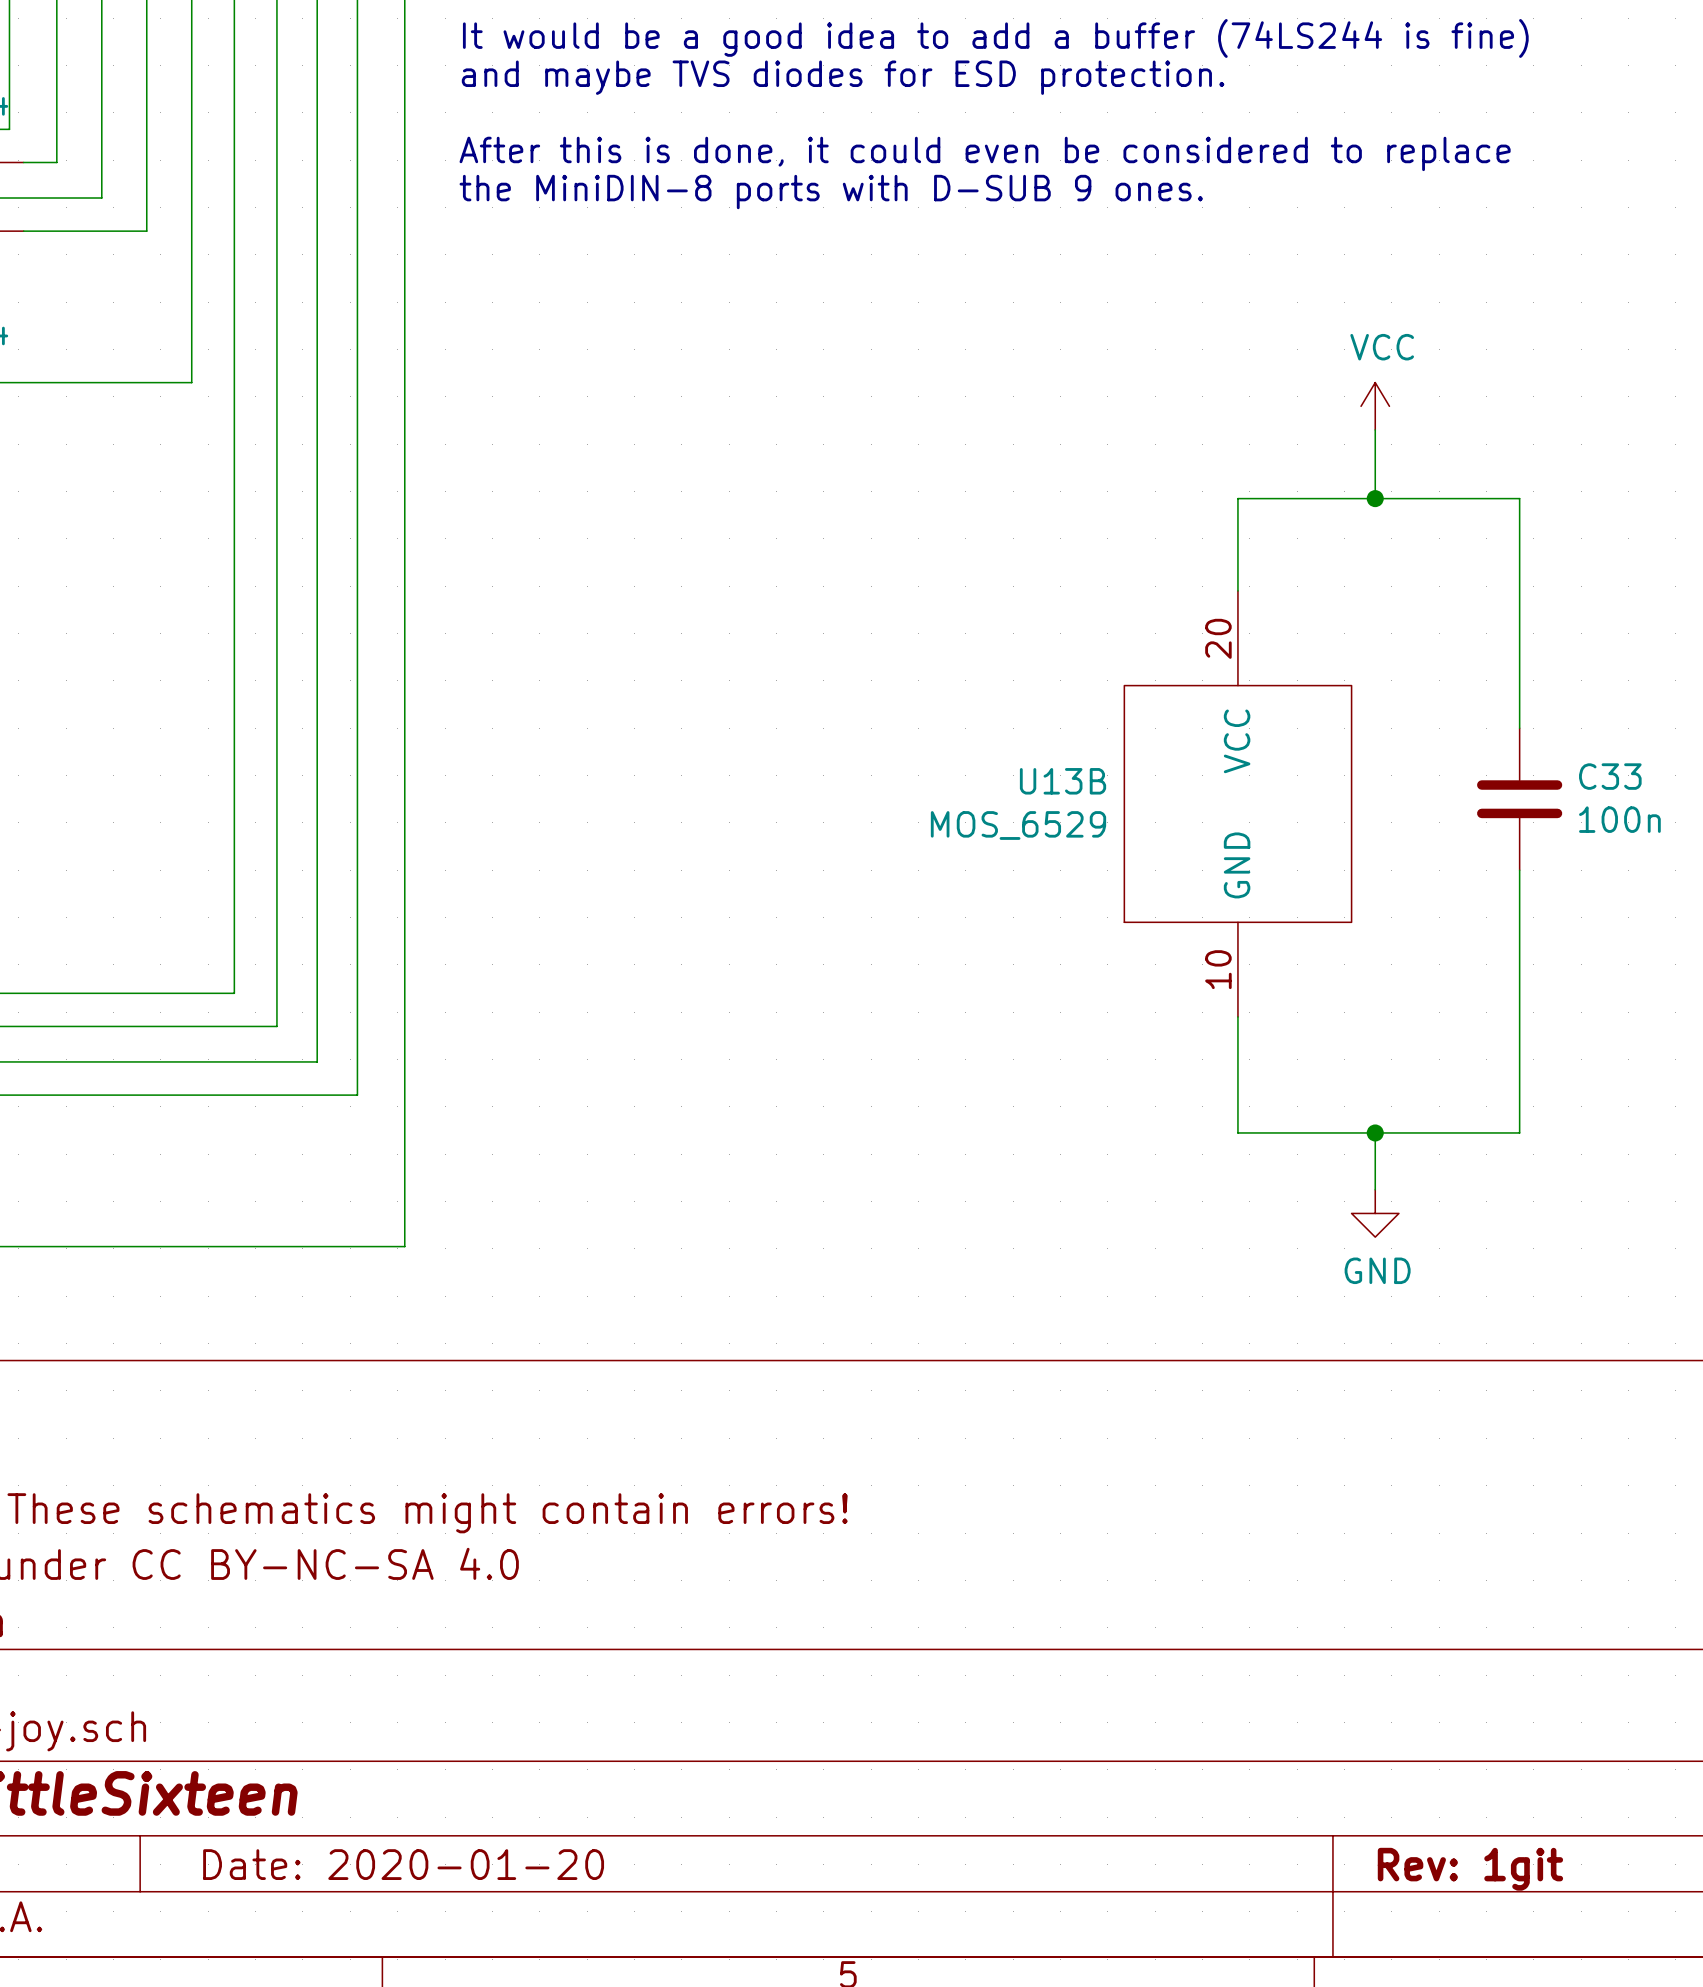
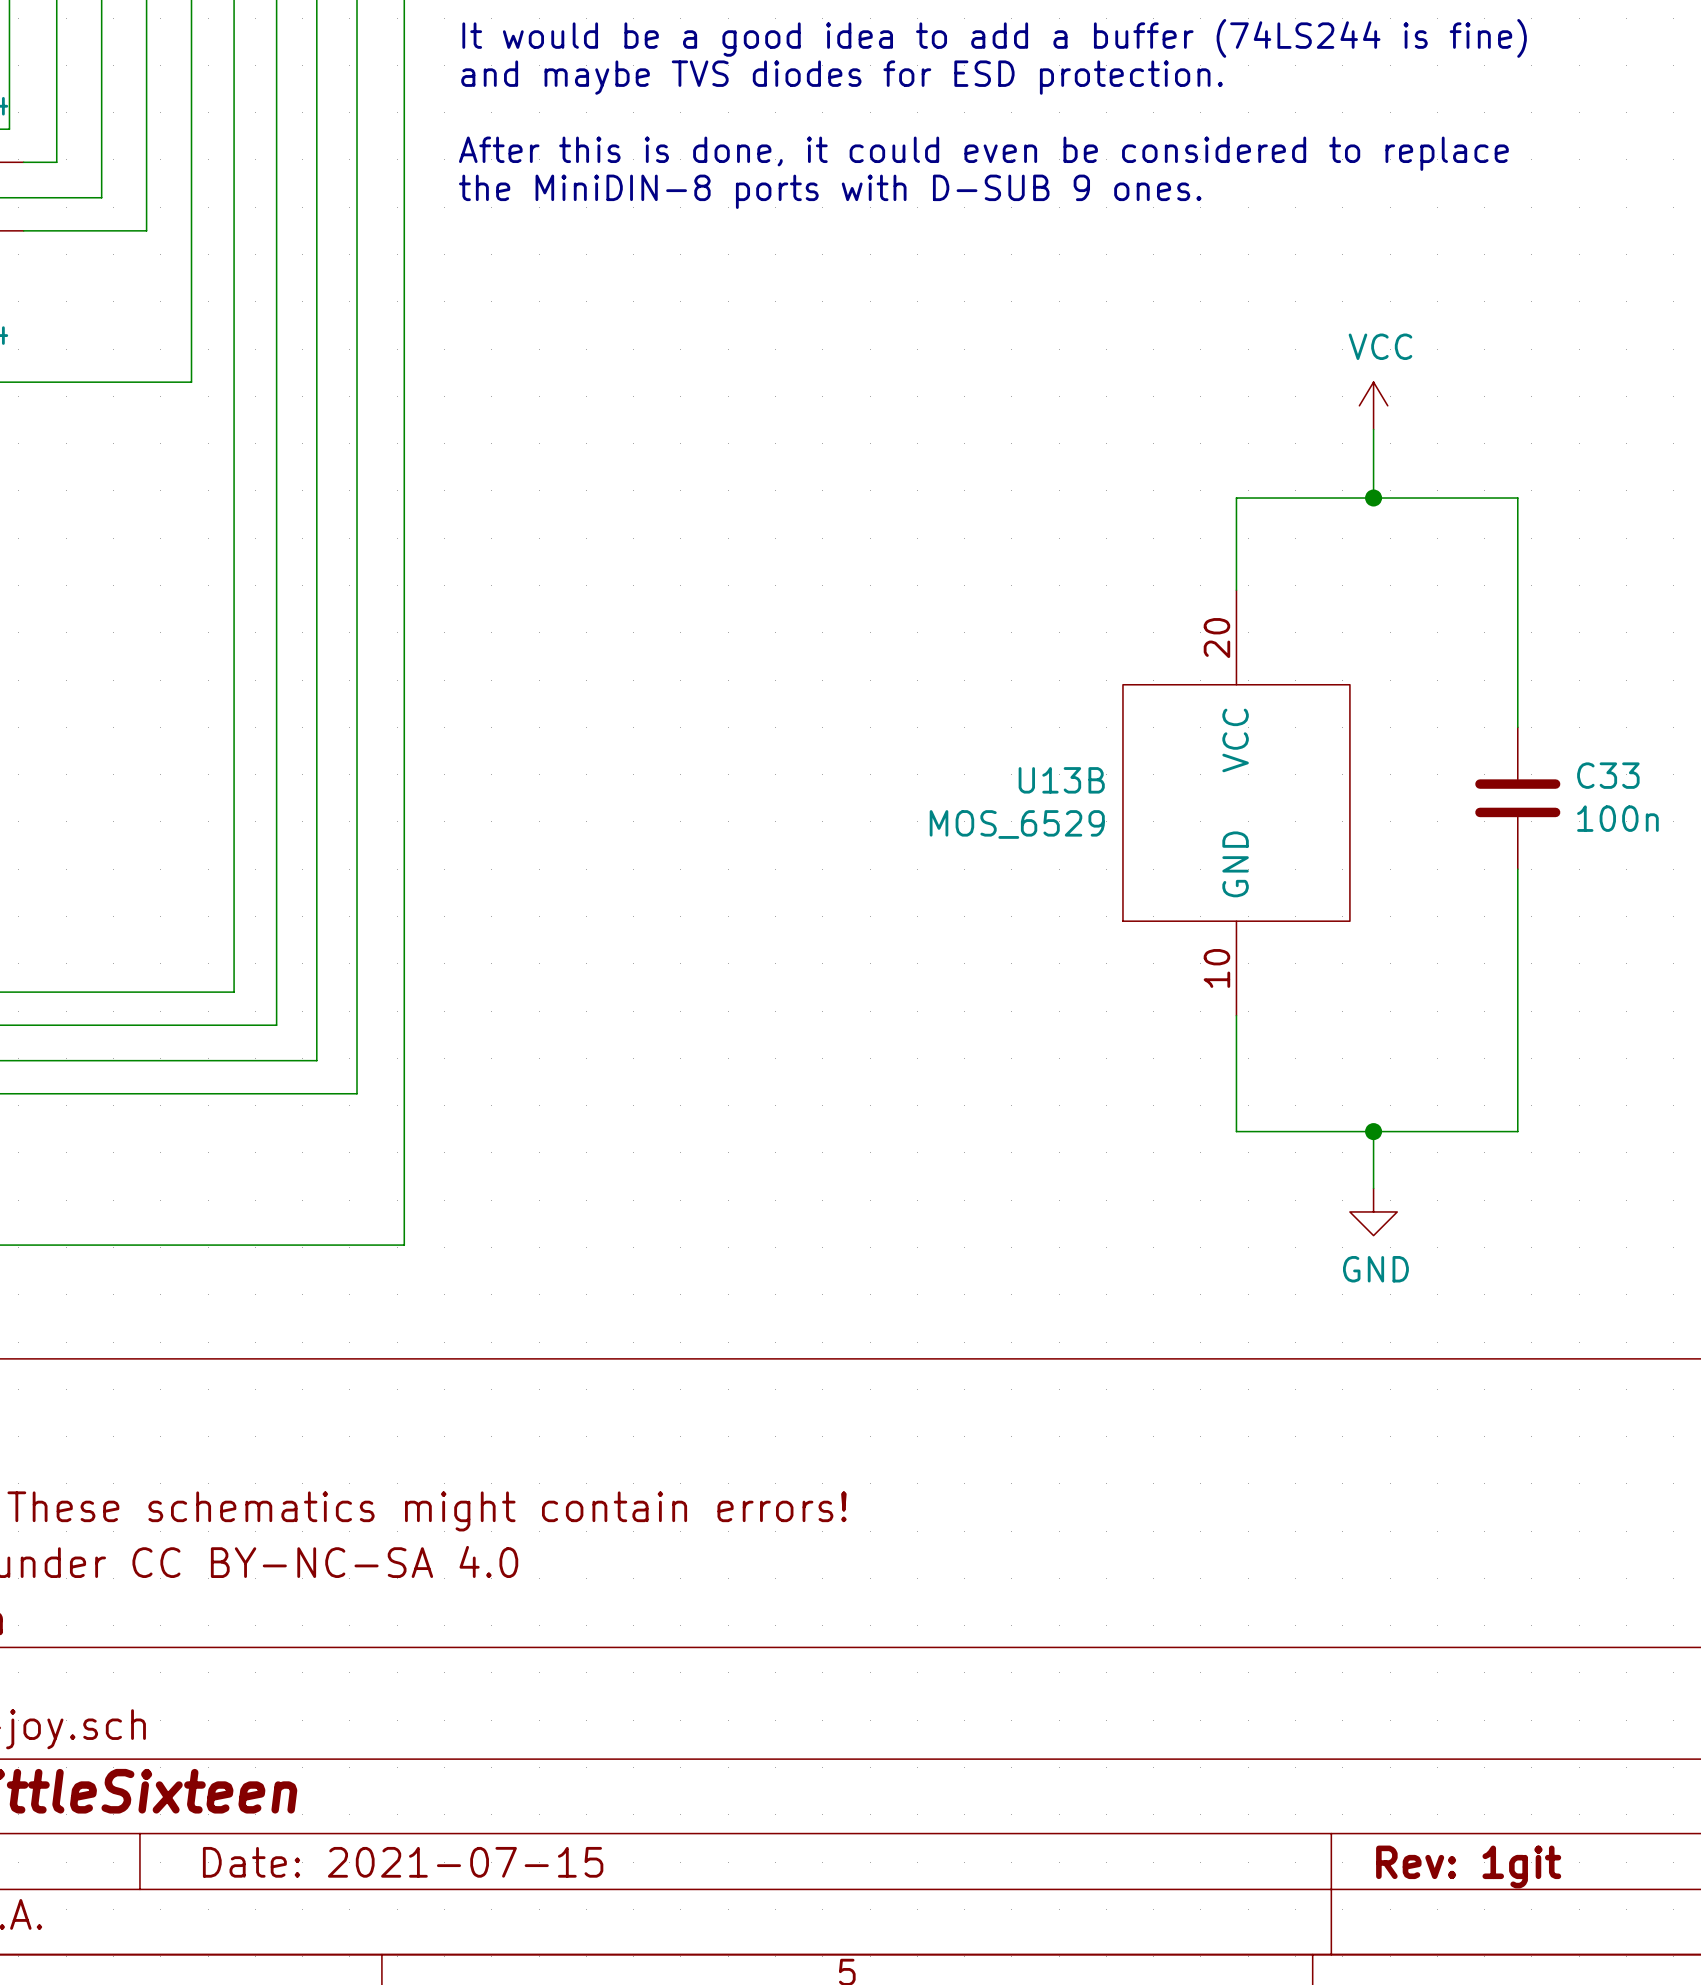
title block: Date: 2020-01-20 (403, 1864) -> Date: 2021-07-15 (403, 1862)

